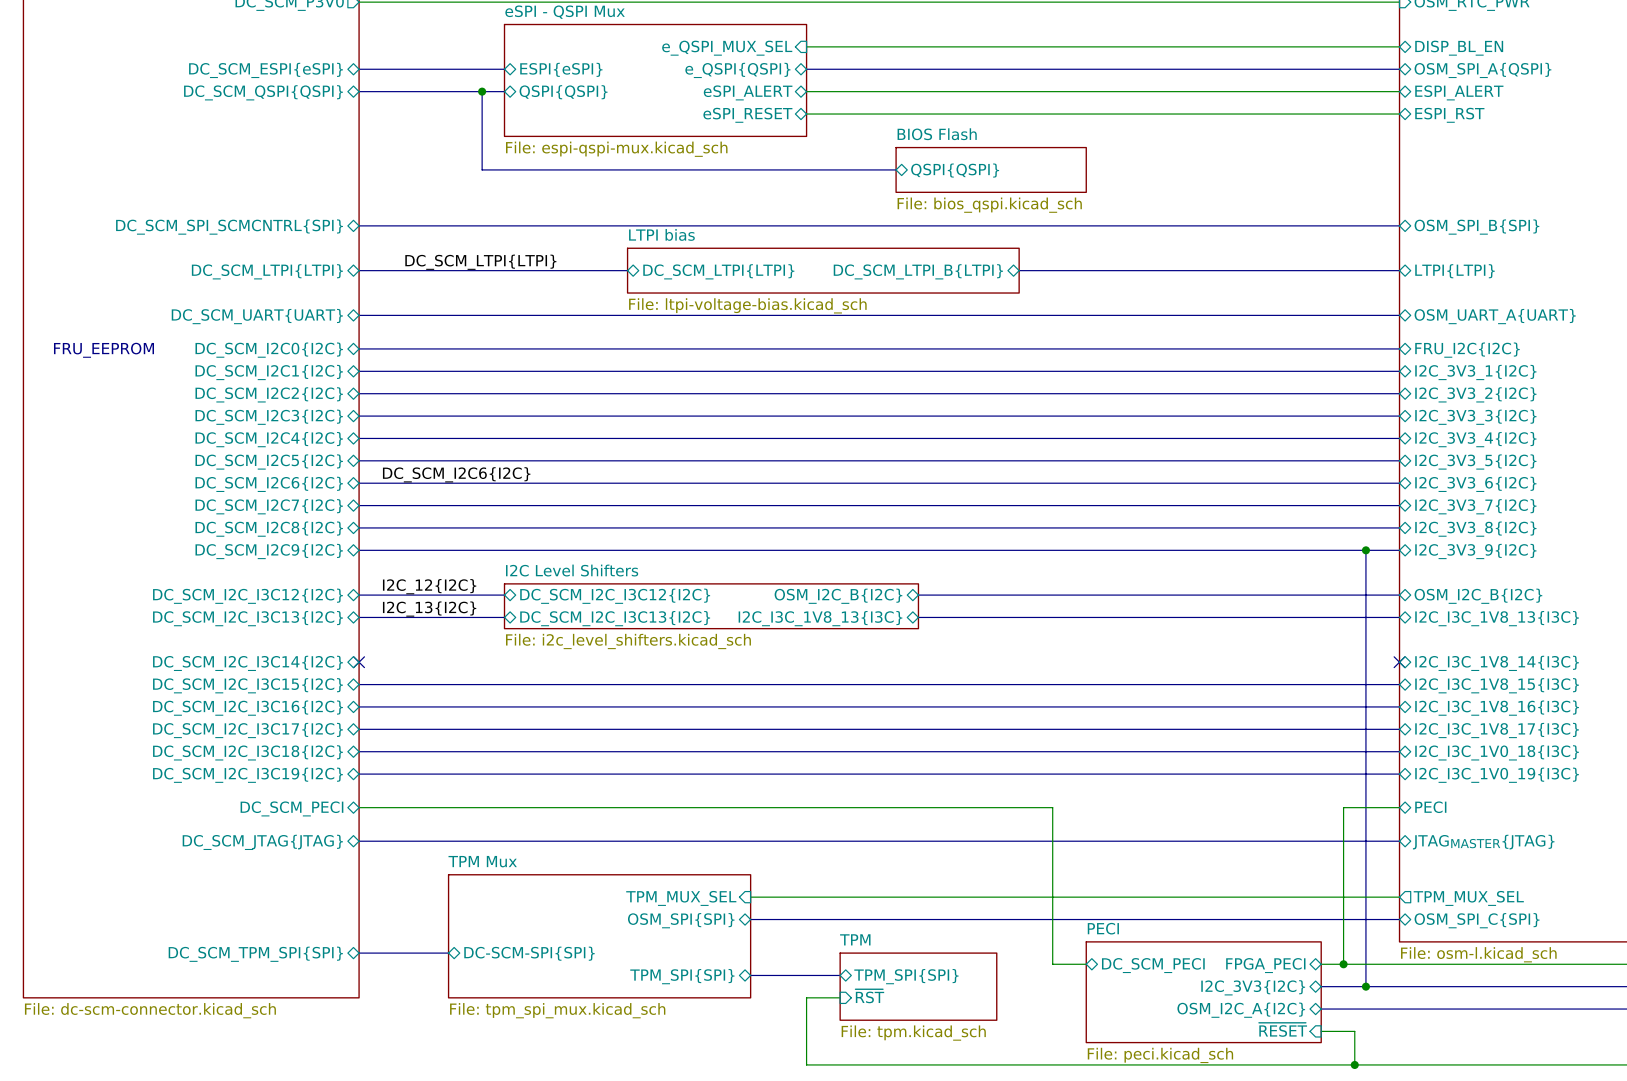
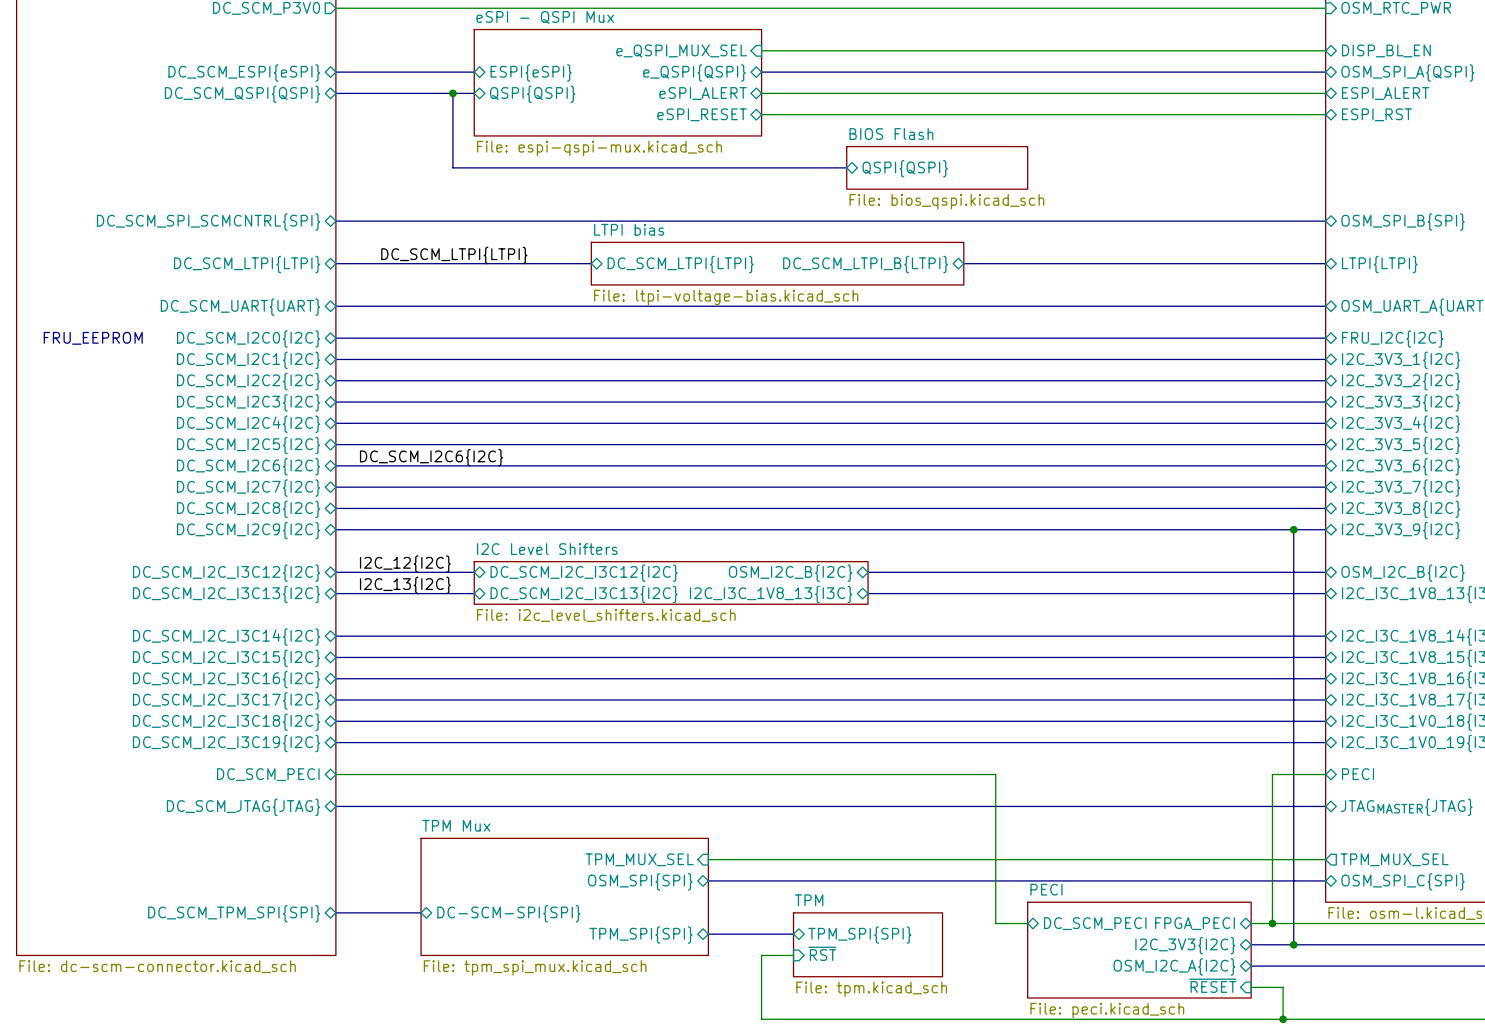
bus: none -> (335, 636) (1325, 636)
no-connect mark: (359, 662) -> none
no-connect mark: (1399, 662) -> none

